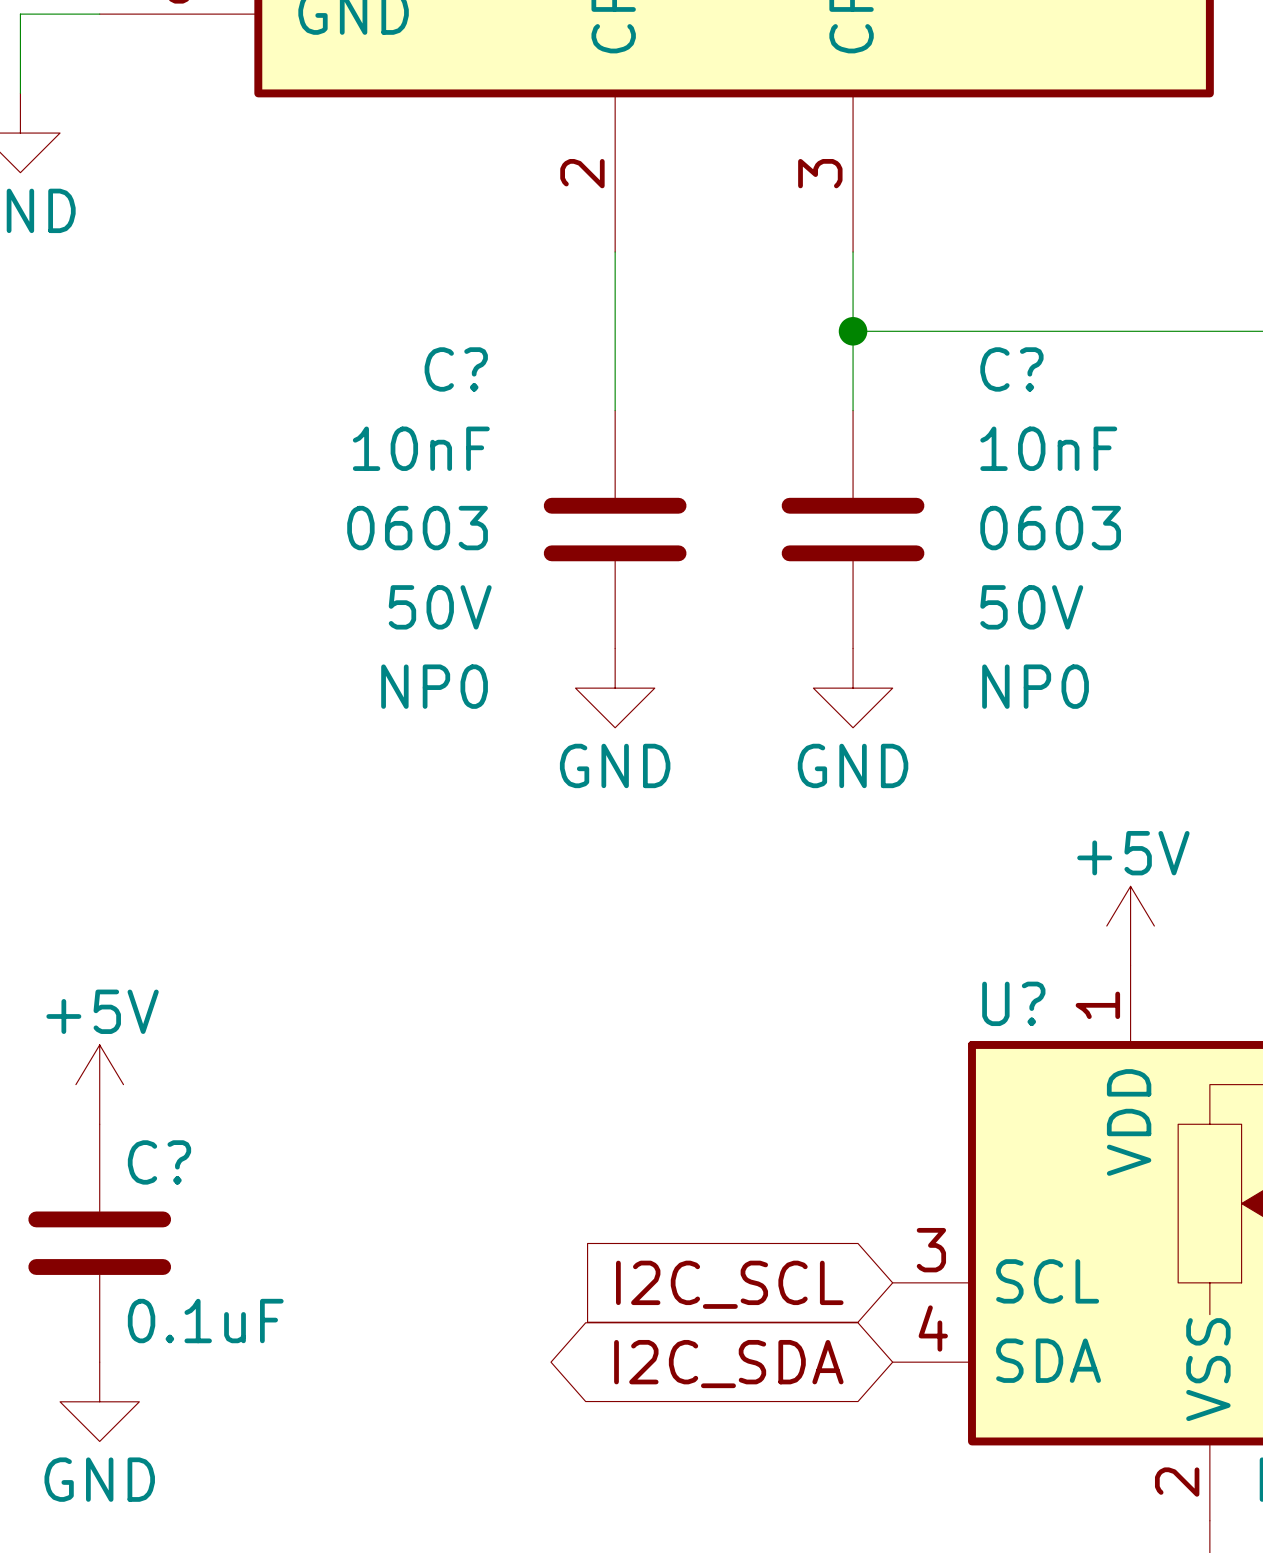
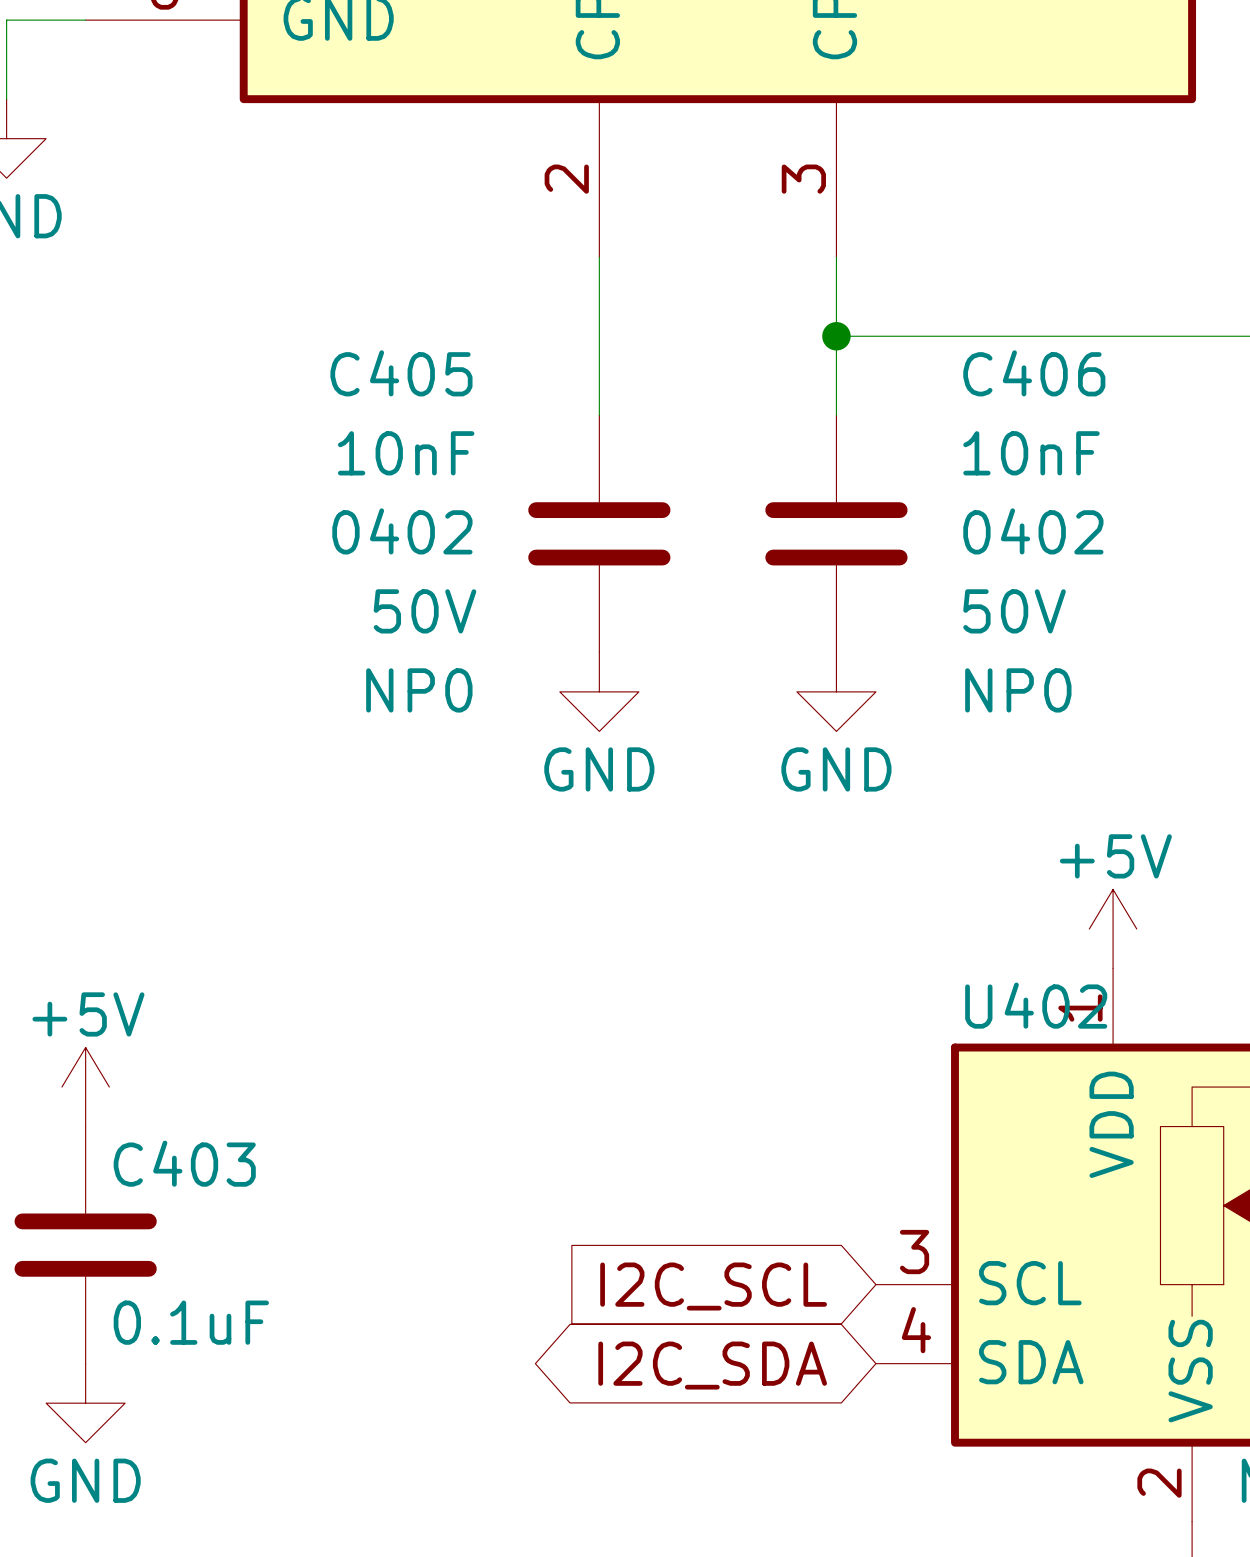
C? name: C? (456, 369) -> C405 (401, 373)
C? name: C? (1011, 369) -> C406 (1034, 373)
C? text: 0603 (417, 528) -> 0402 (402, 531)
C? text: 0603 (1050, 528) -> 0402 (1033, 531)
U? name: U? (1013, 1003) -> U402 (1036, 1005)
C? name: C? (159, 1162) -> C403 (184, 1163)

